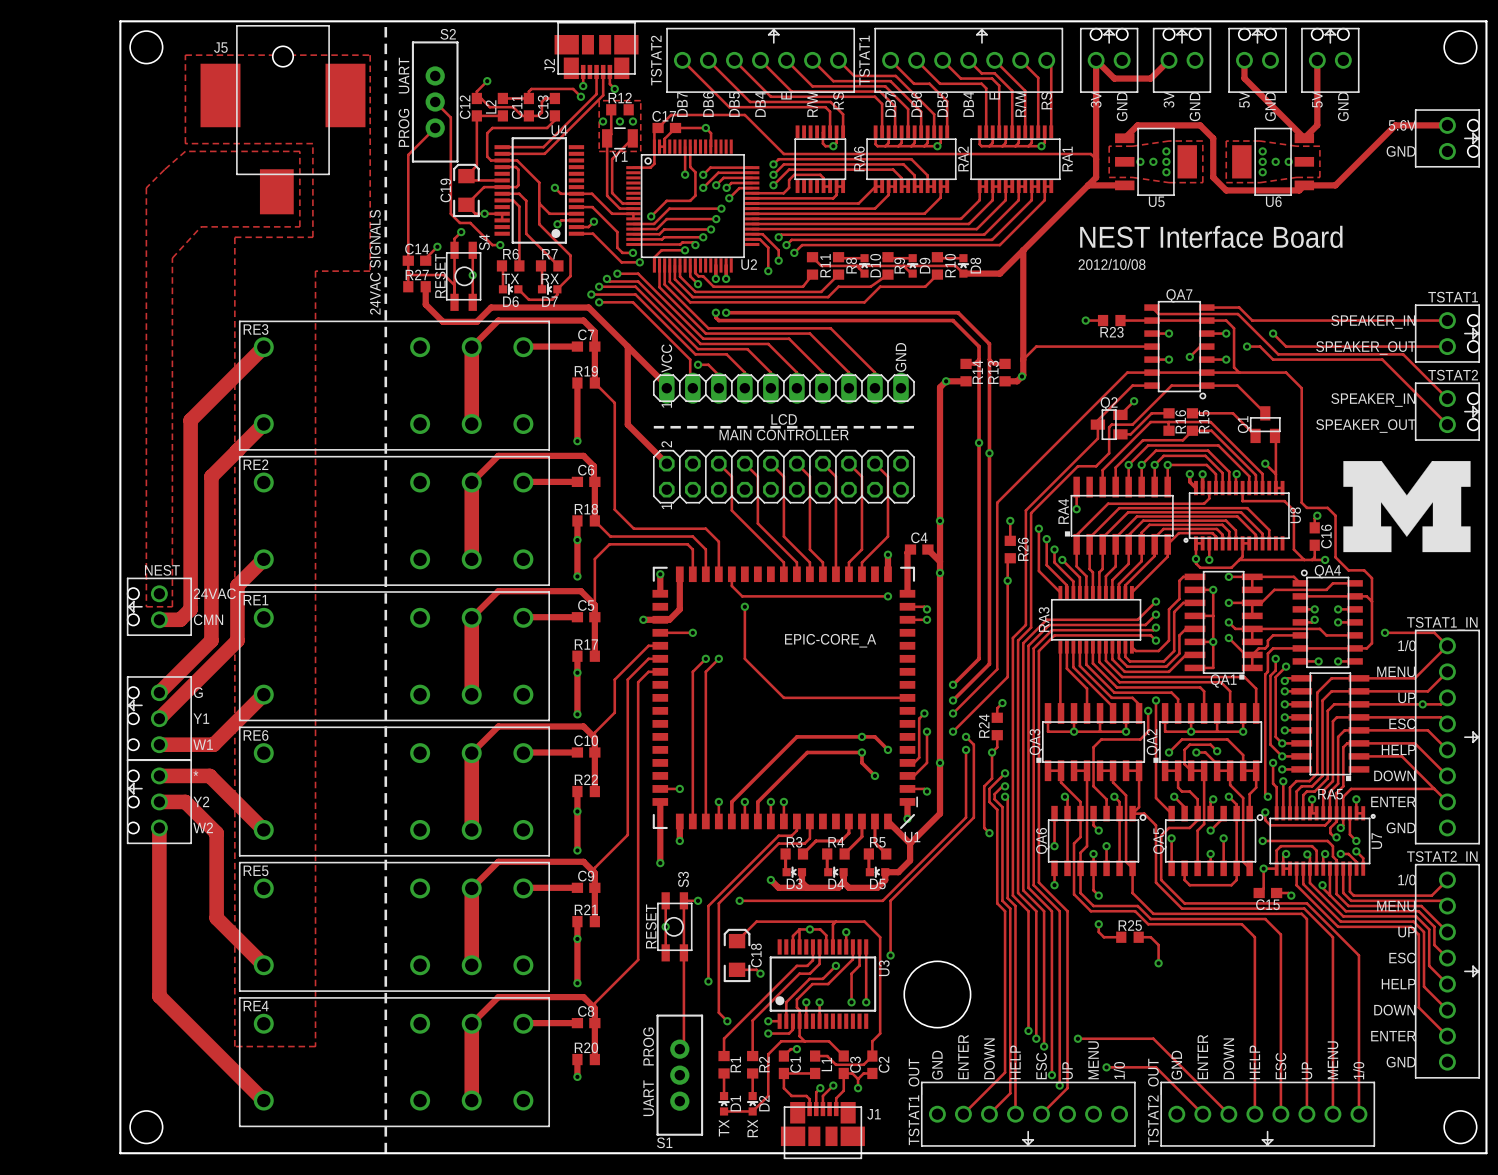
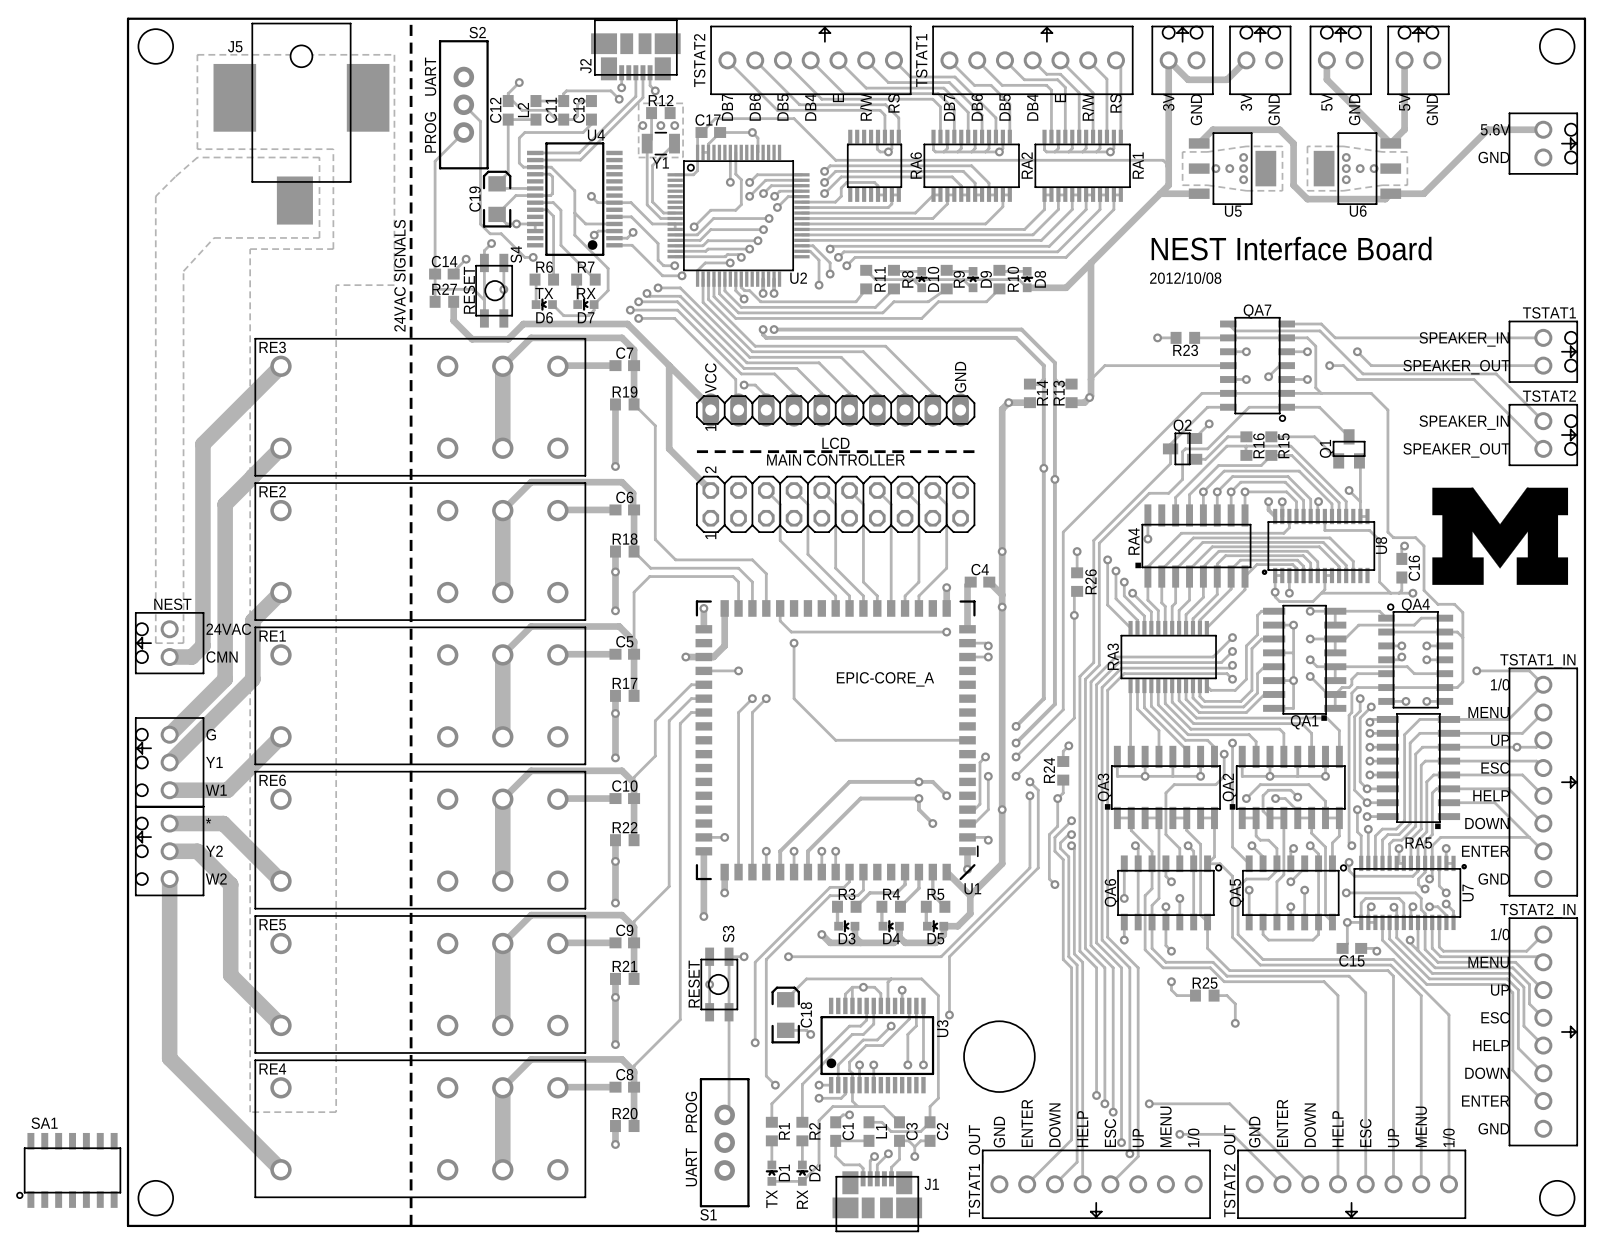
SA1: none -> (68, 1170)

